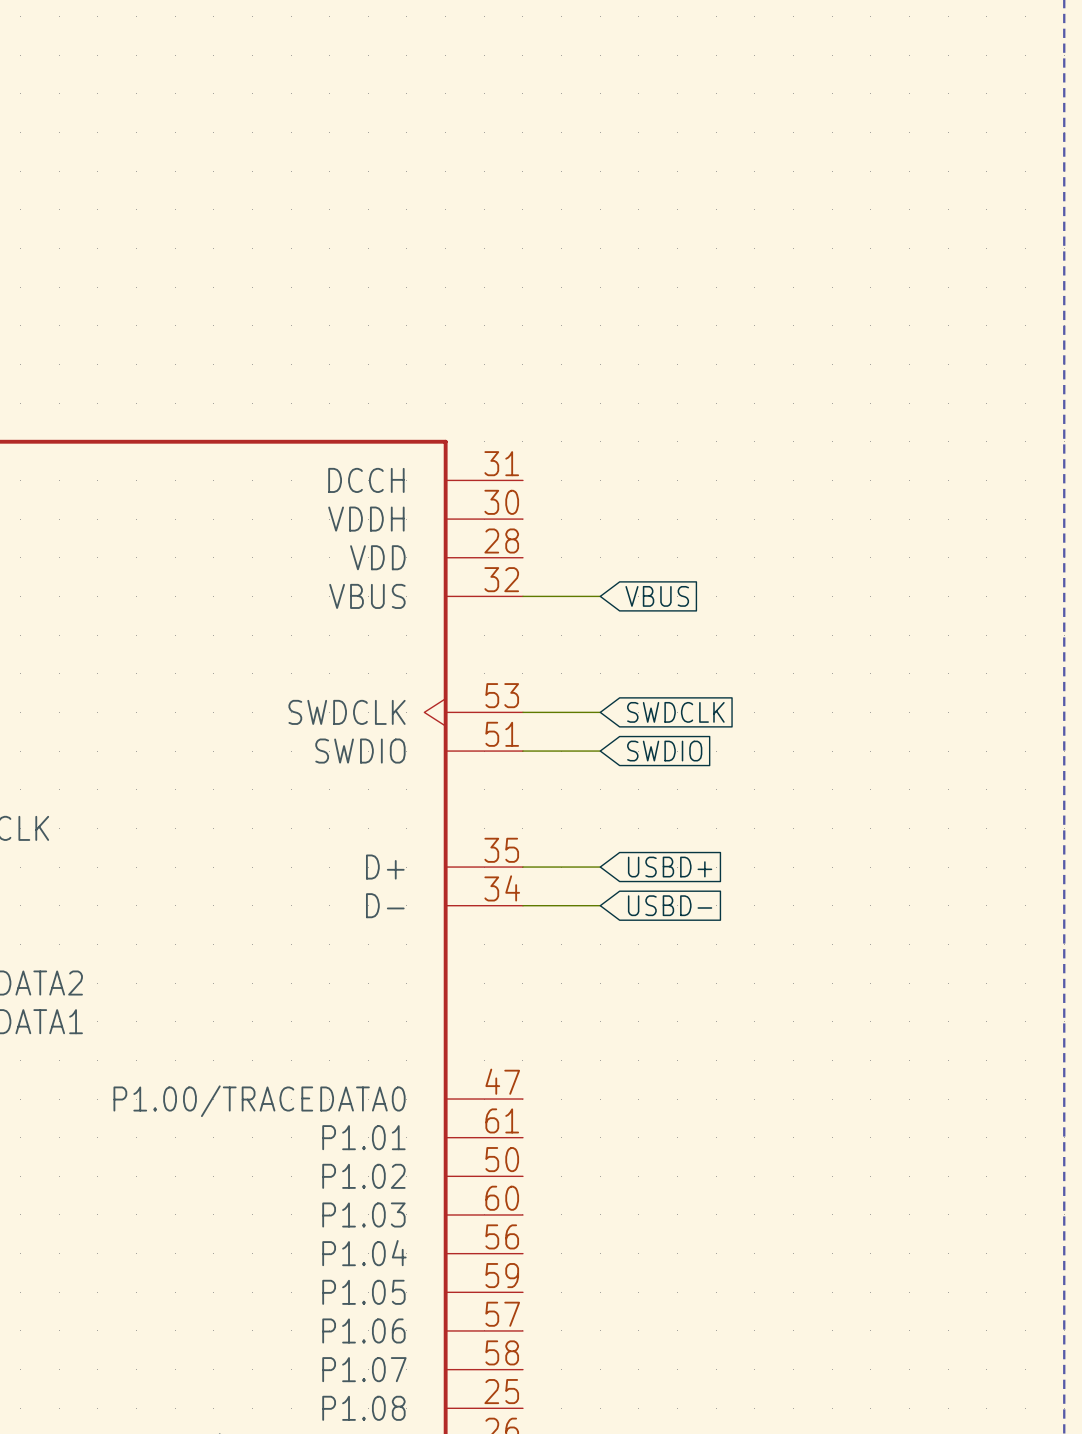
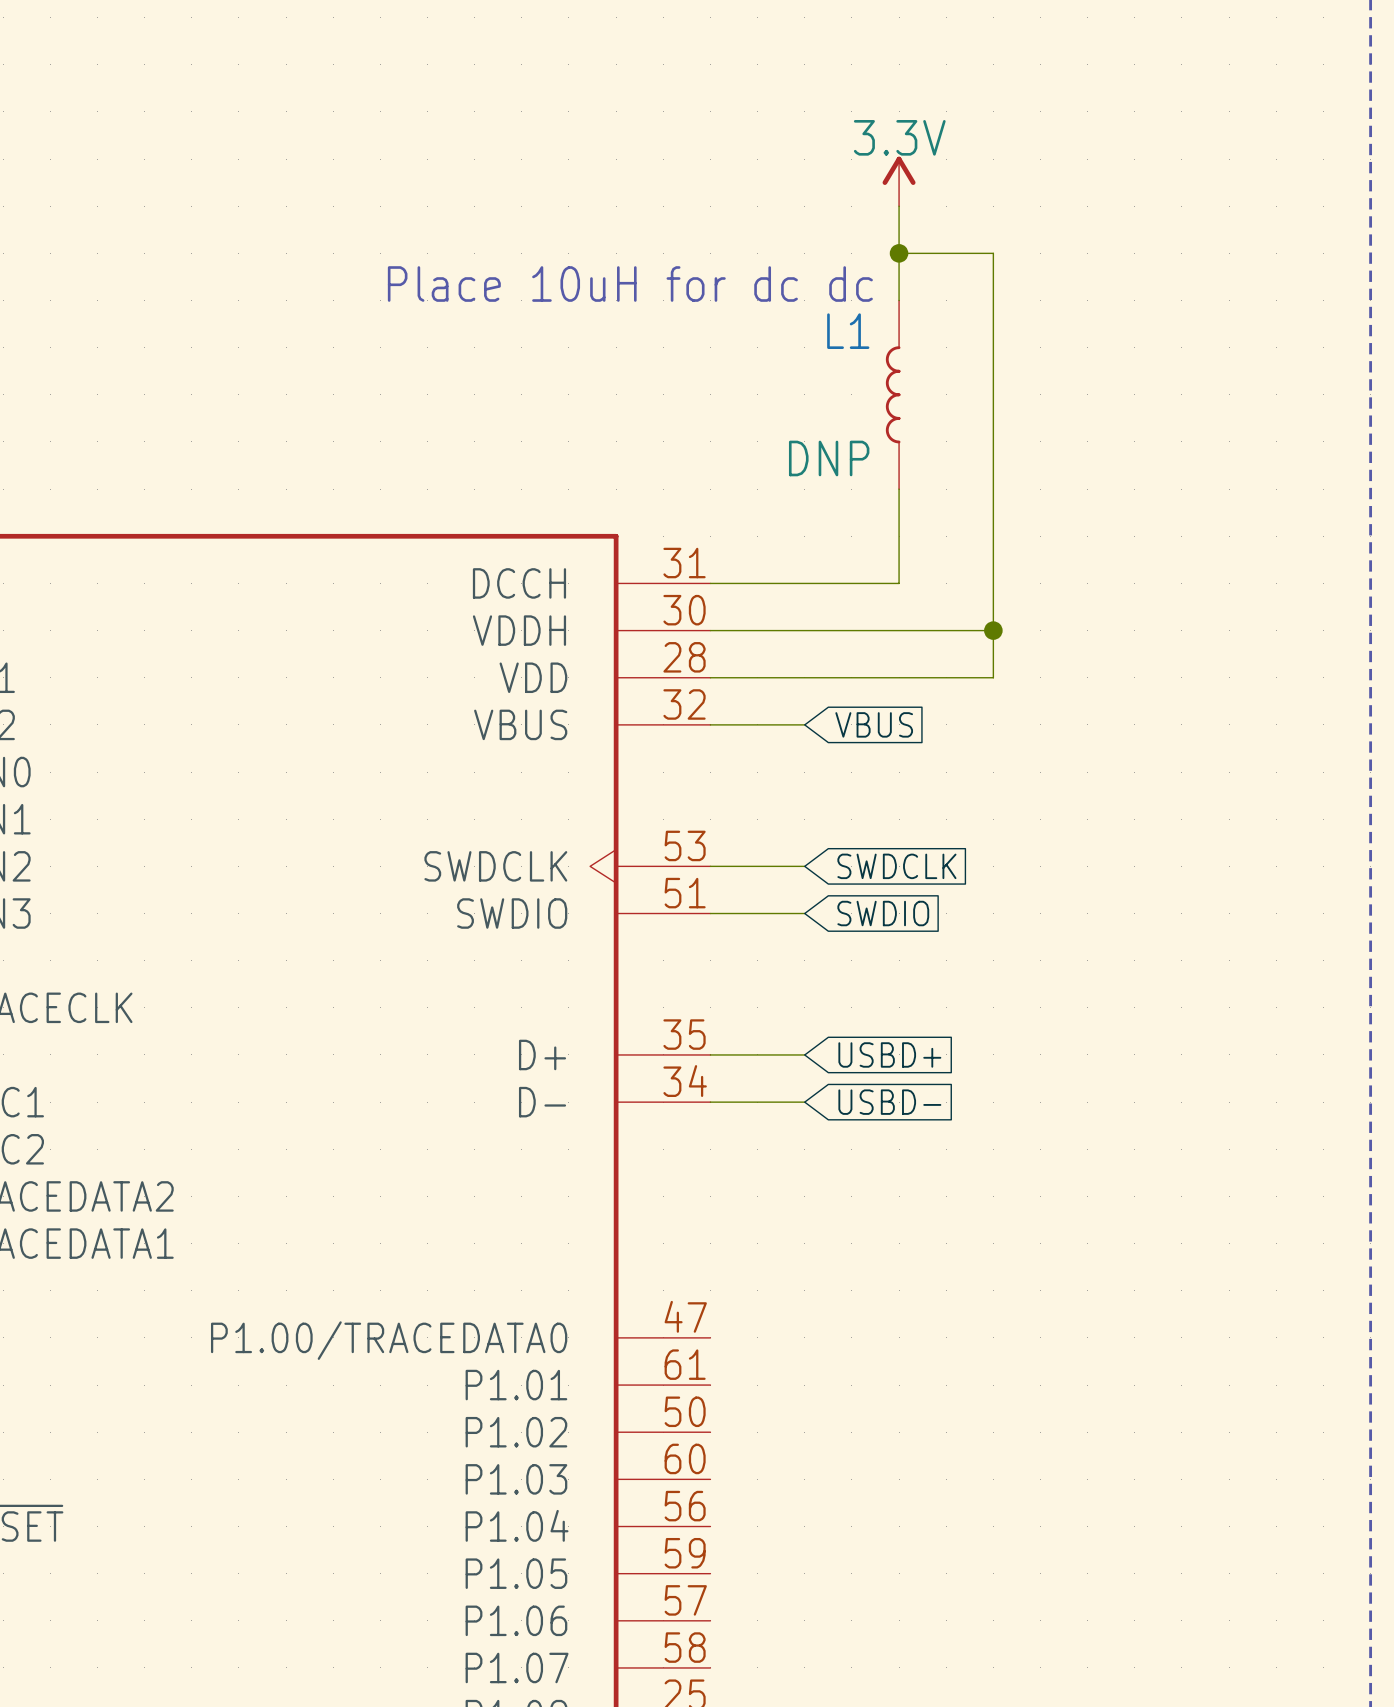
power symbol: none -> 3.3V (899, 181)
wire: none -> (899, 206) (899, 300)
wire: none -> (899, 253) (993, 253) (993, 677) (710, 677)
junction: none -> (899, 253)
text: none -> Place 10uH for dc dc (630, 284)
L1: none -> DNP (893, 394)
wire: none -> (899, 489) (899, 583) (710, 583)
wire: none -> (710, 630) (993, 630)
junction: none -> (993, 630)

